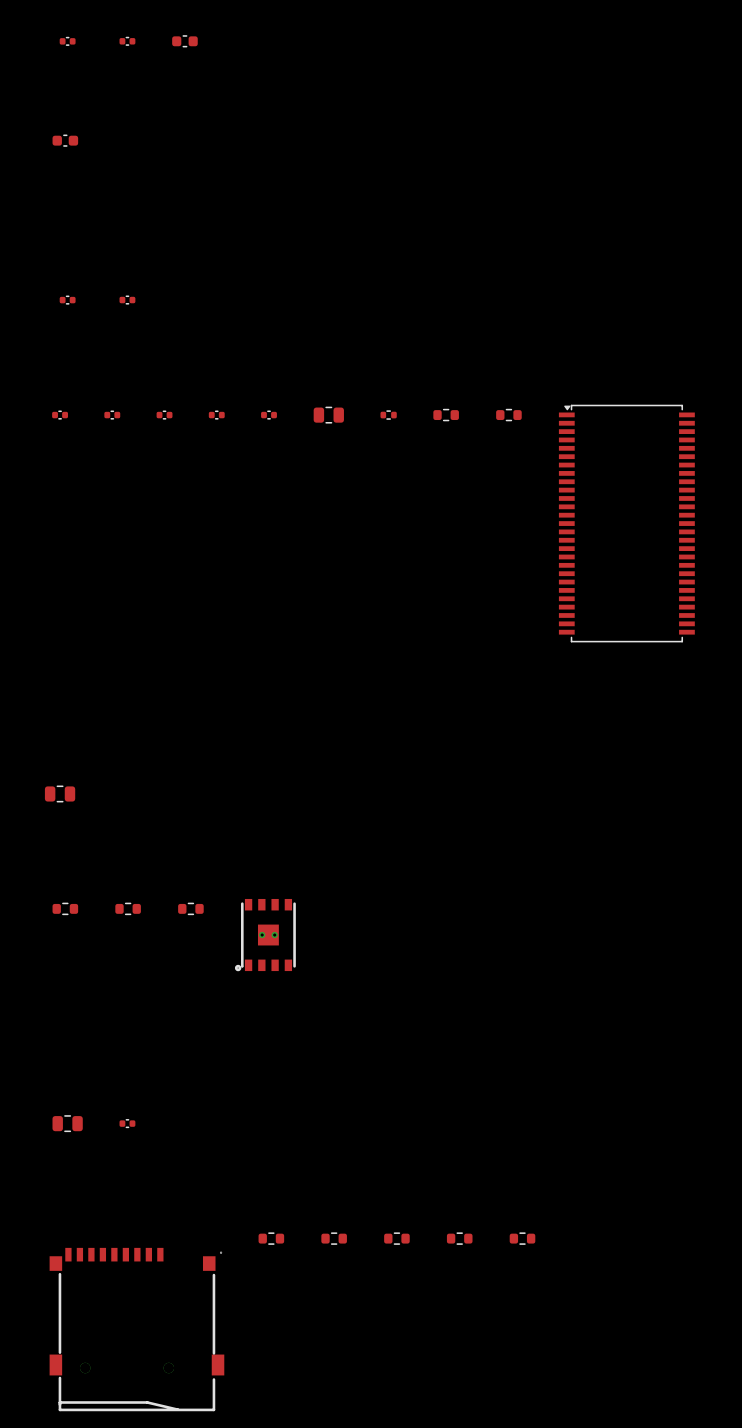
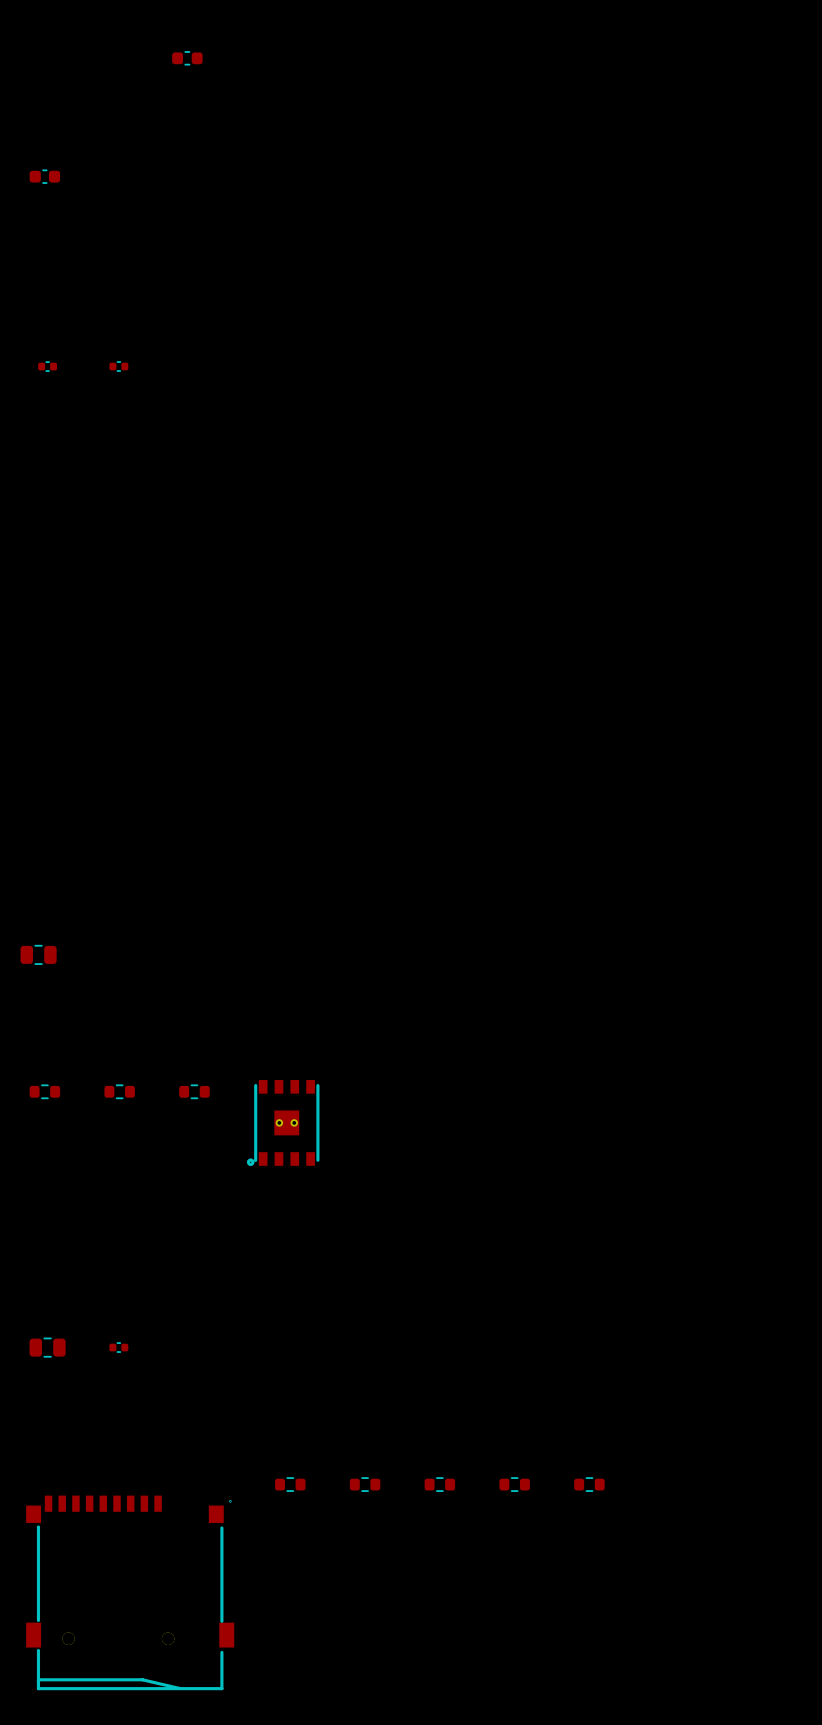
part: (67, 41) -> none
part: (127, 41) -> none
part: (60, 415) -> none
part: (112, 415) -> none
part: (164, 415) -> none
part: (216, 415) -> none
part: (269, 415) -> none
part: (328, 415) -> none
part: (388, 415) -> none
part: (446, 415) -> none
part: (508, 415) -> none
part: (626, 523) -> none

